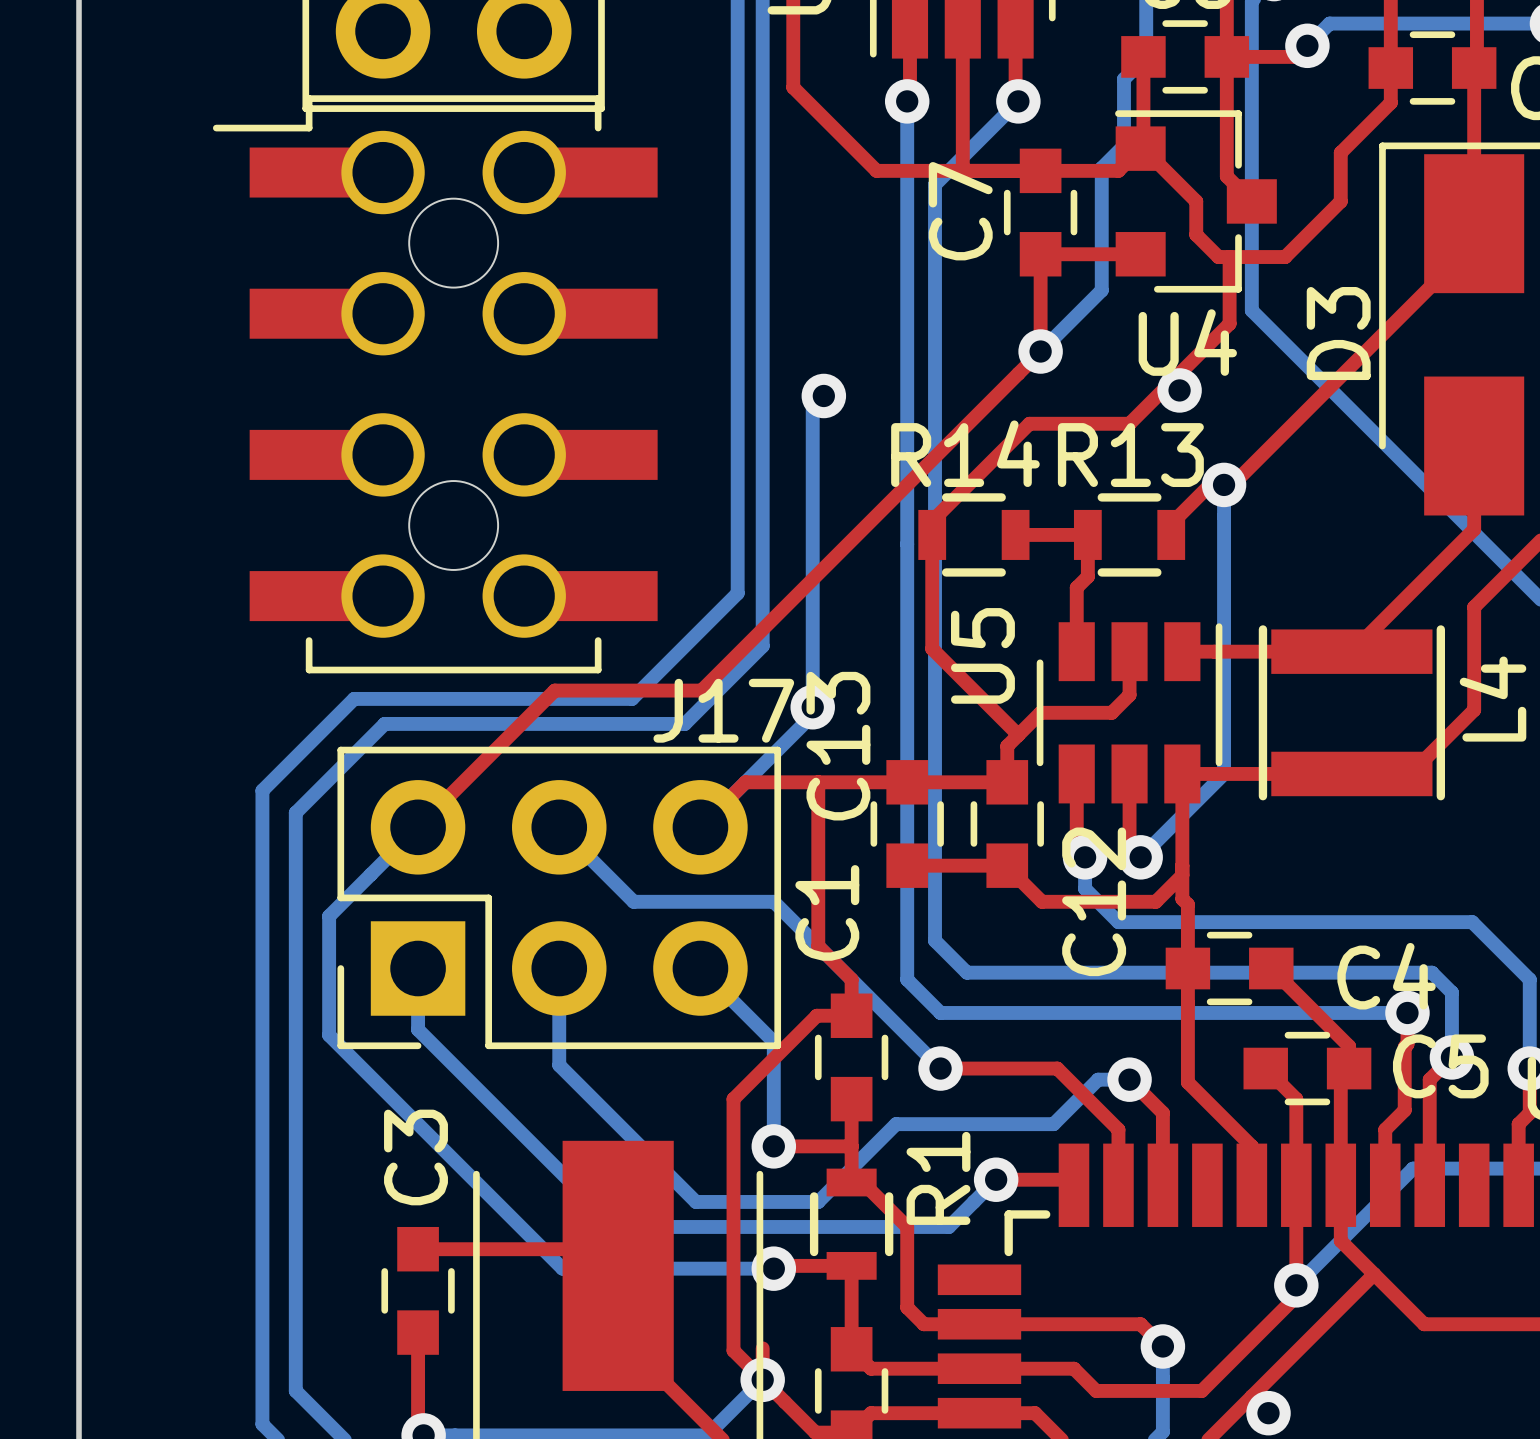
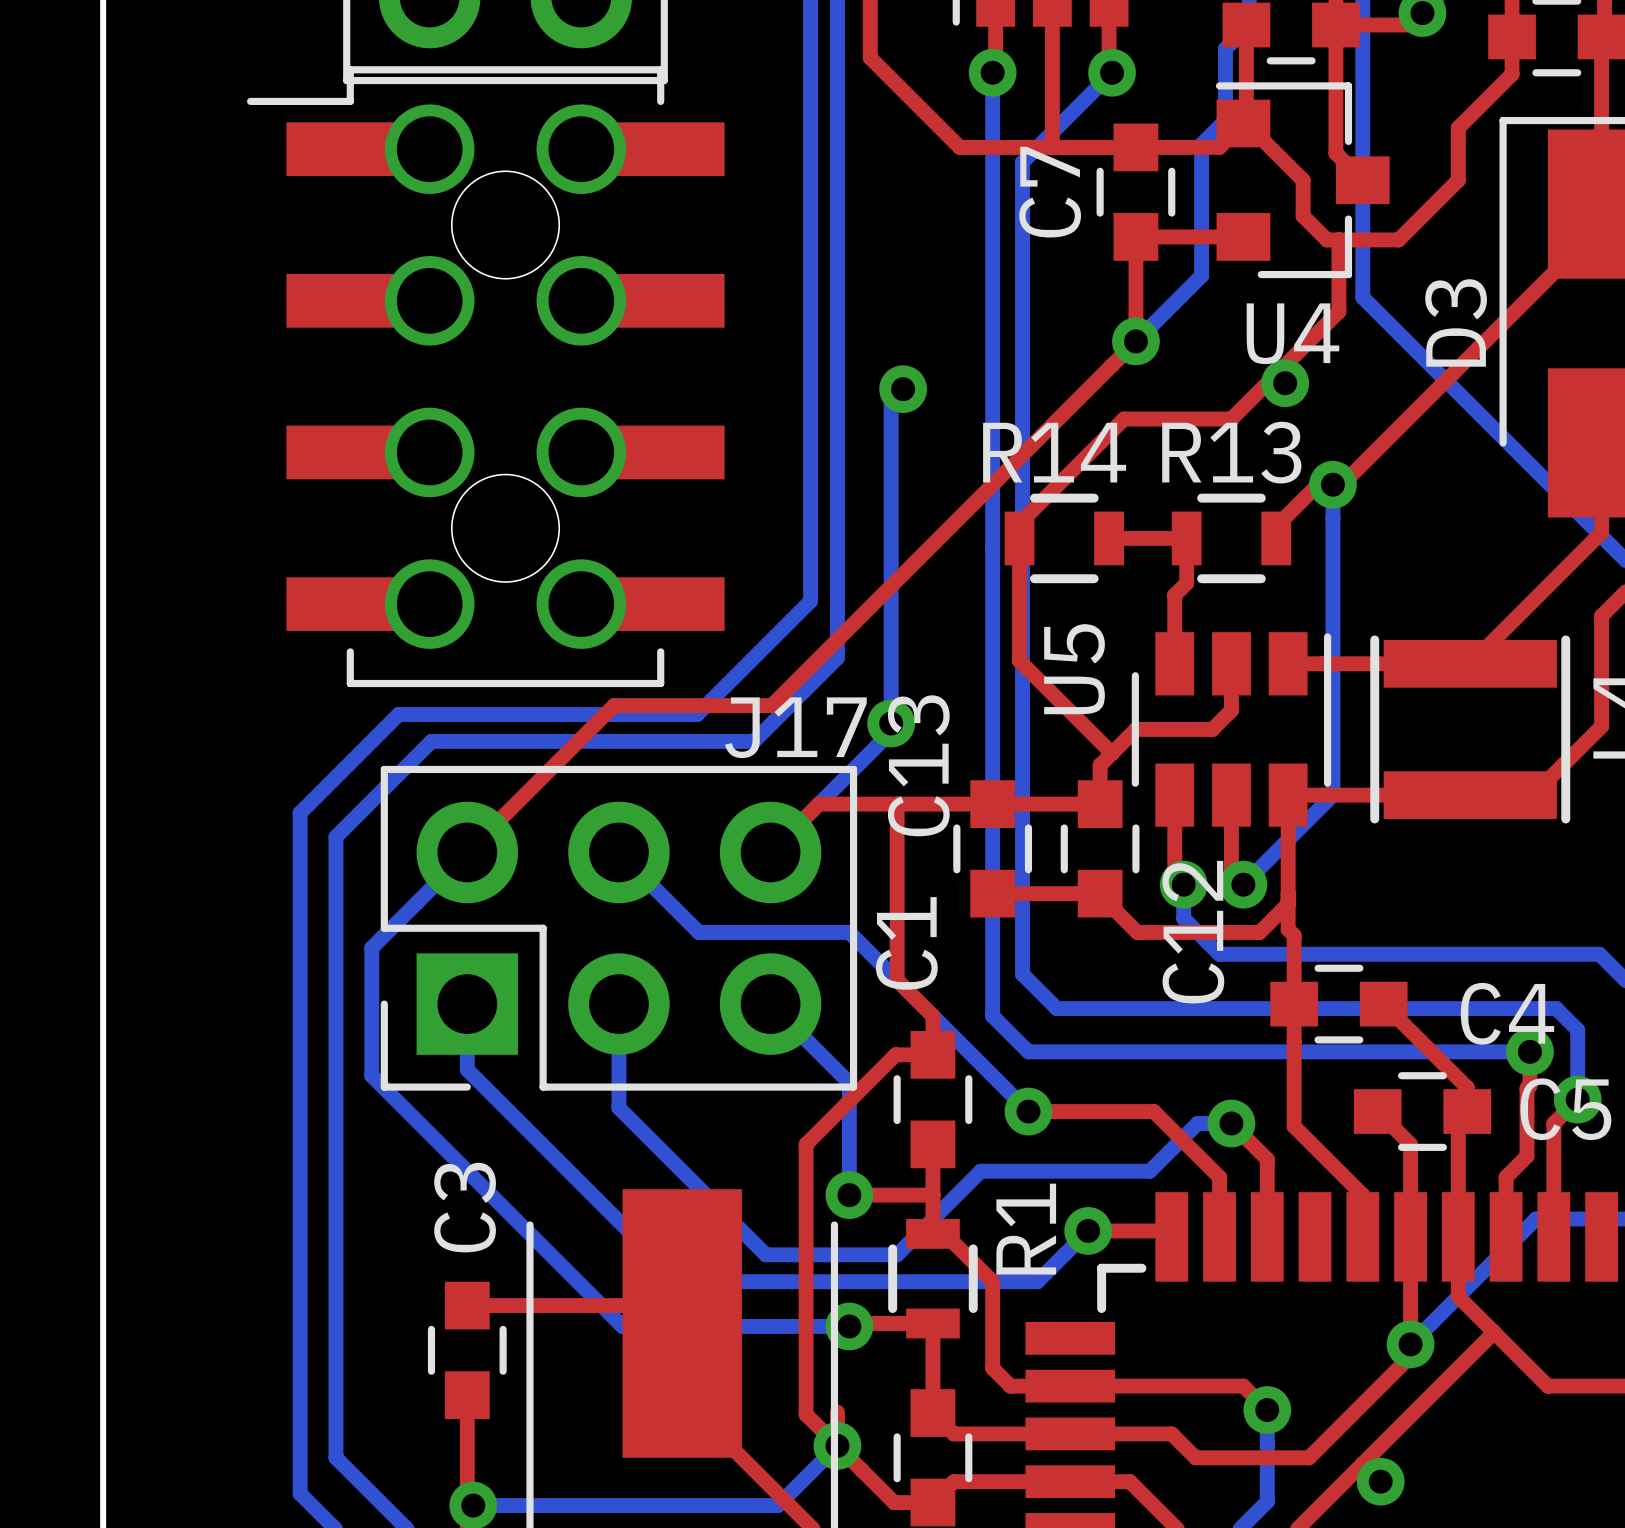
part footprint: [212, 95, 658, 674] -> [247, 66, 725, 688]

